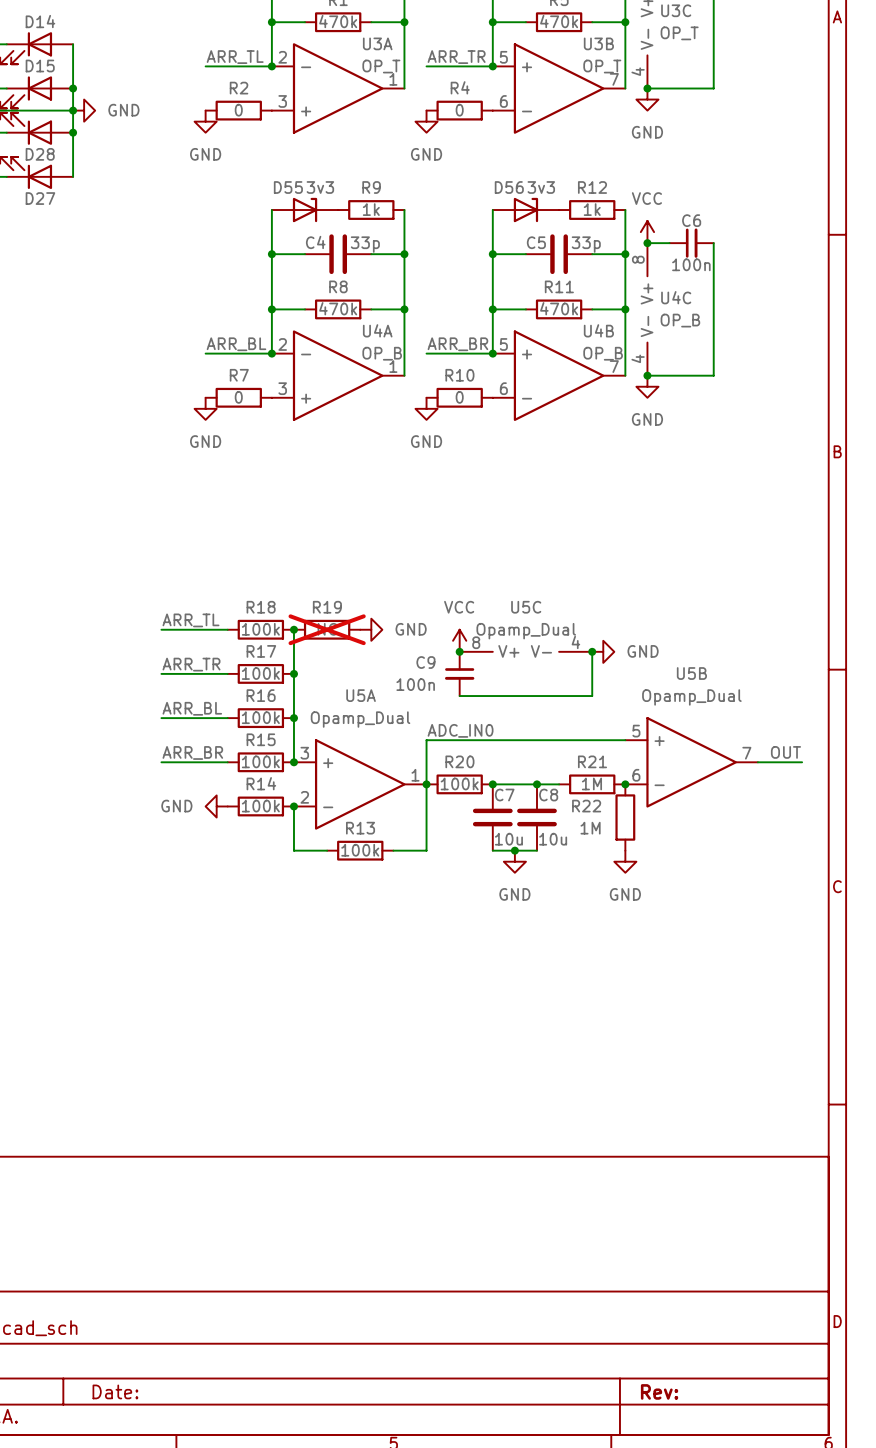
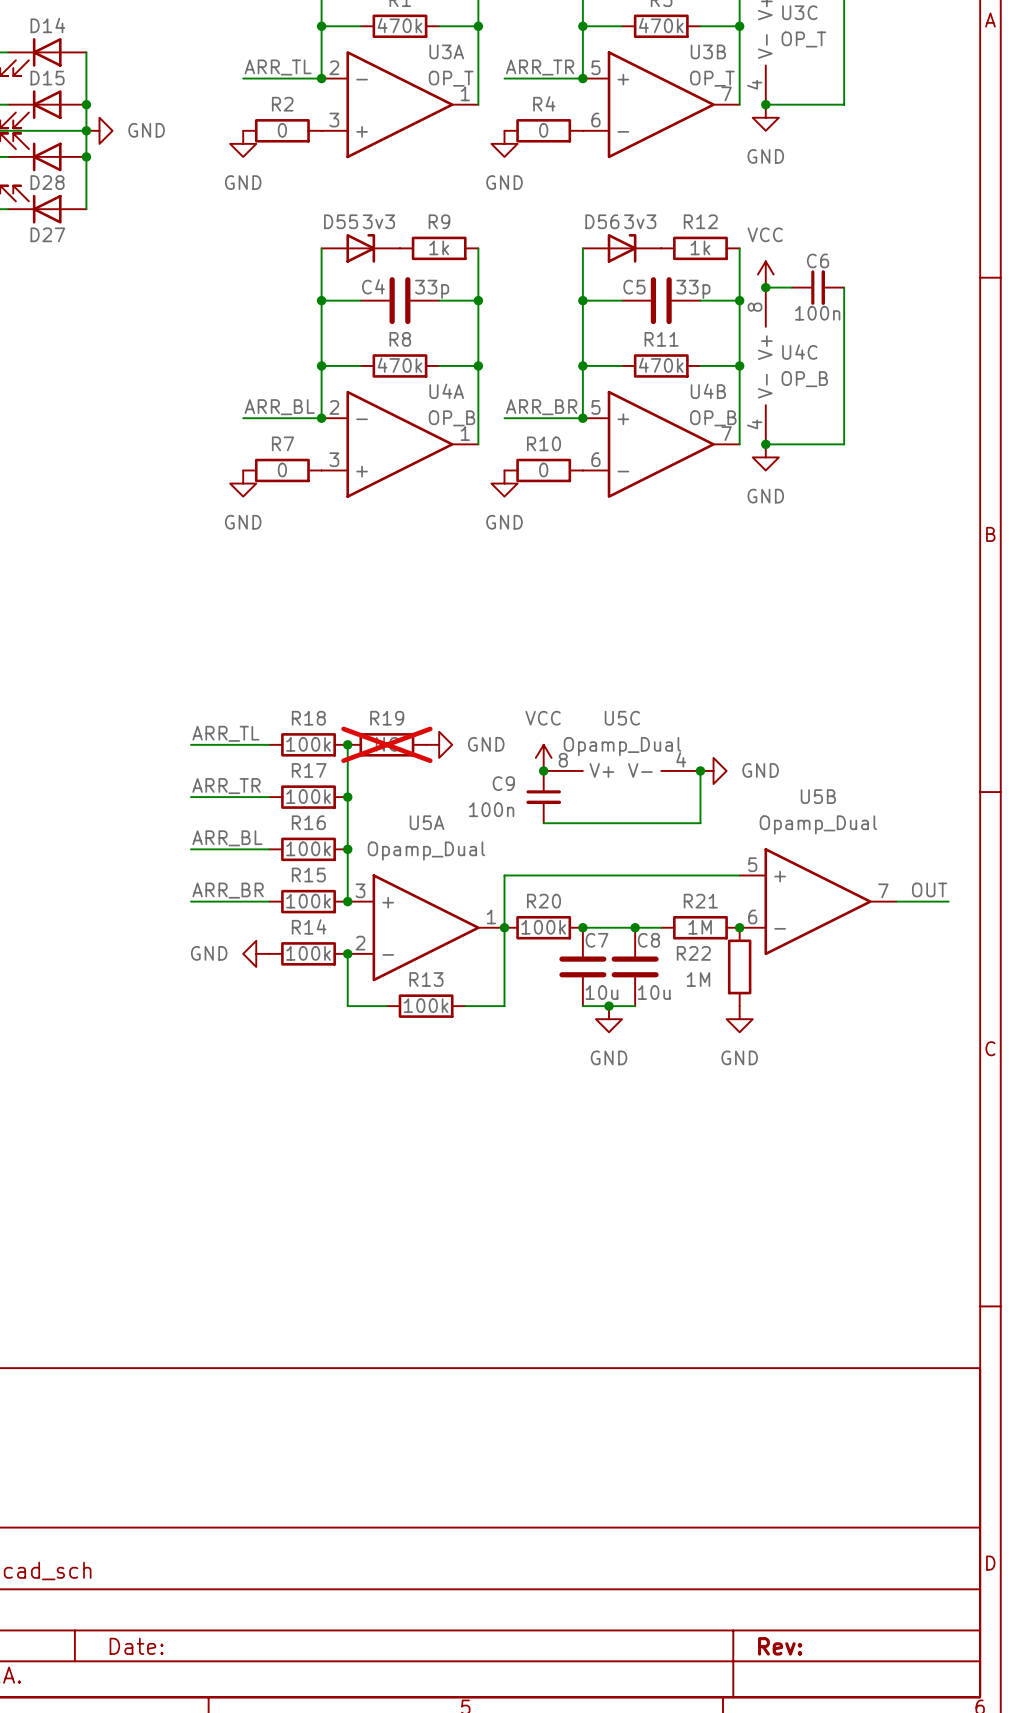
label: ADC_IN0 (460, 730) -> none

